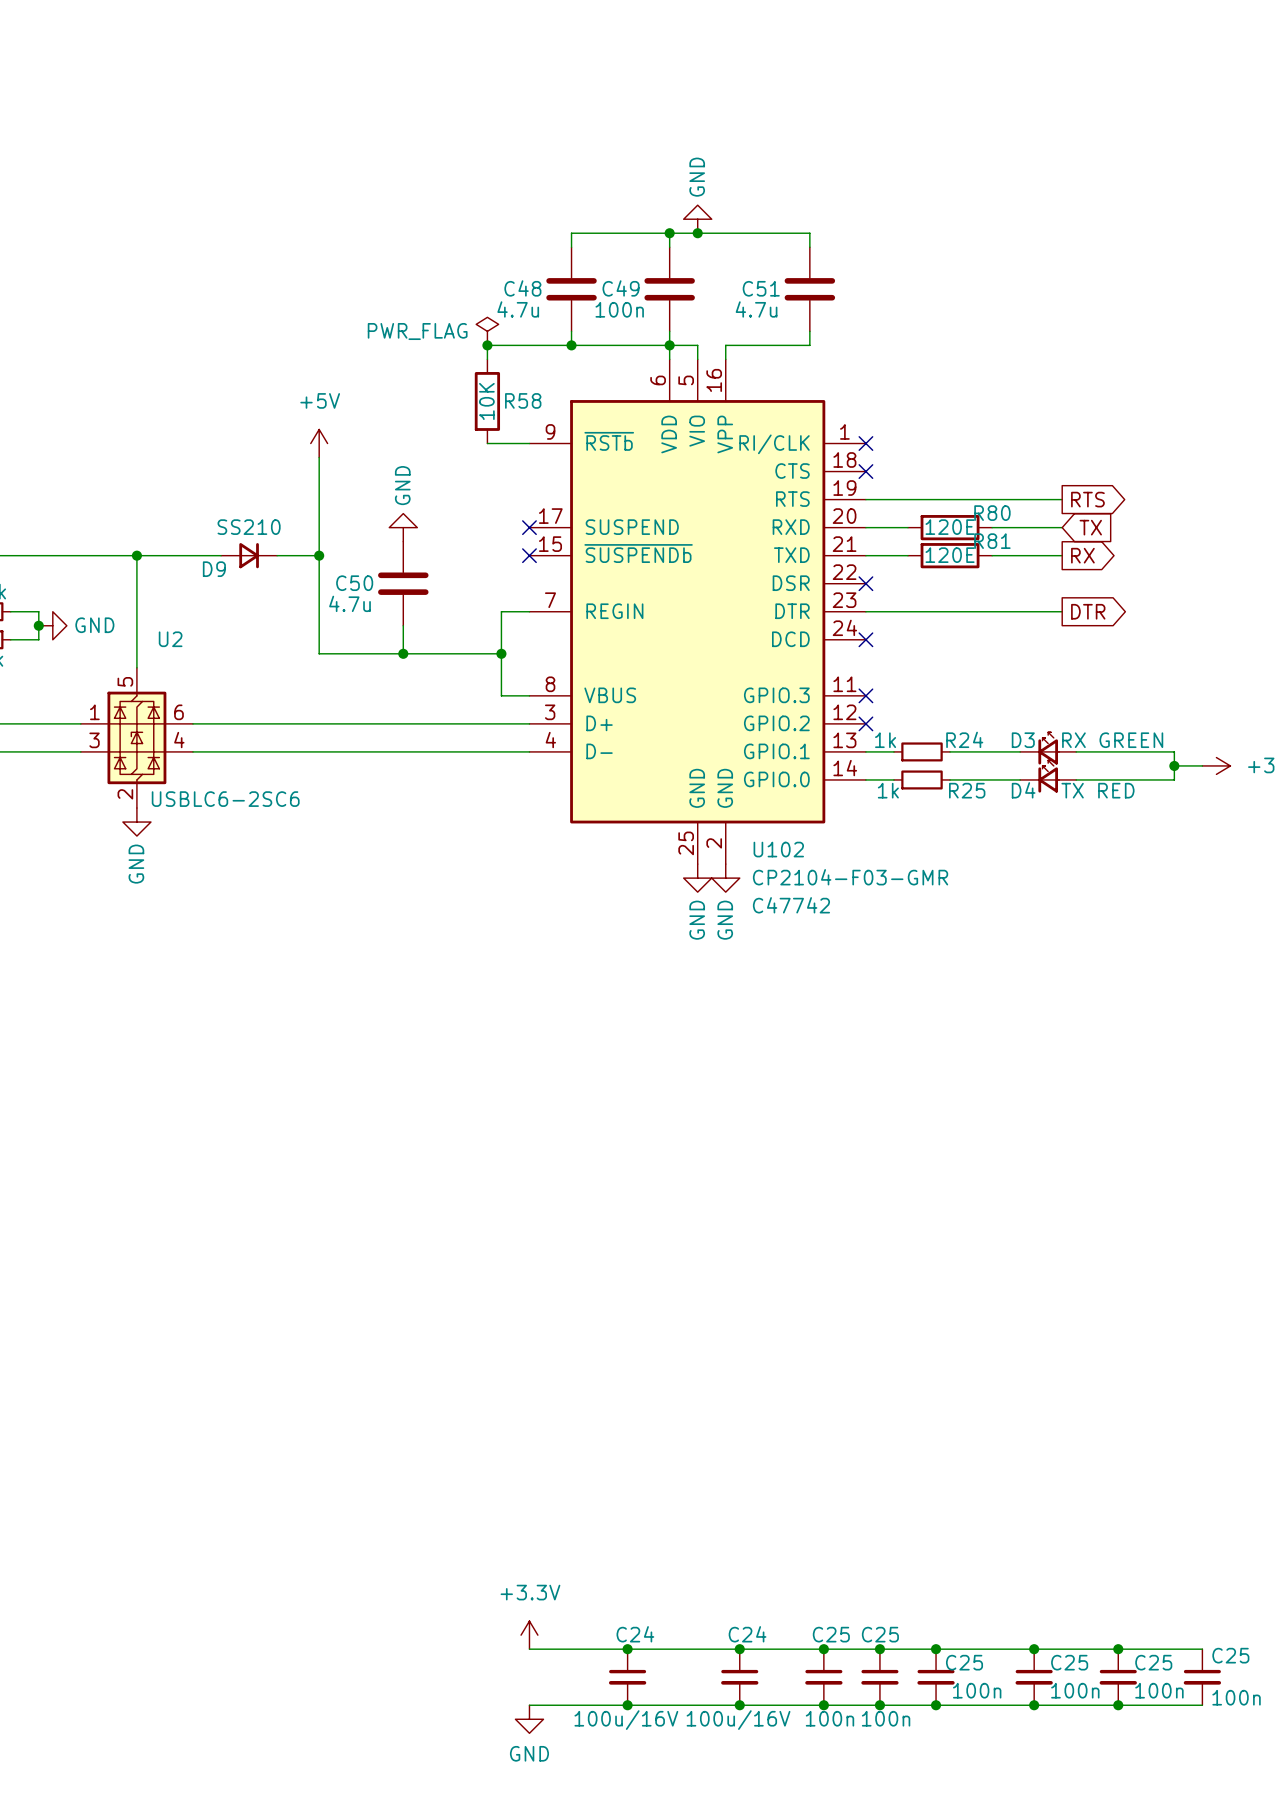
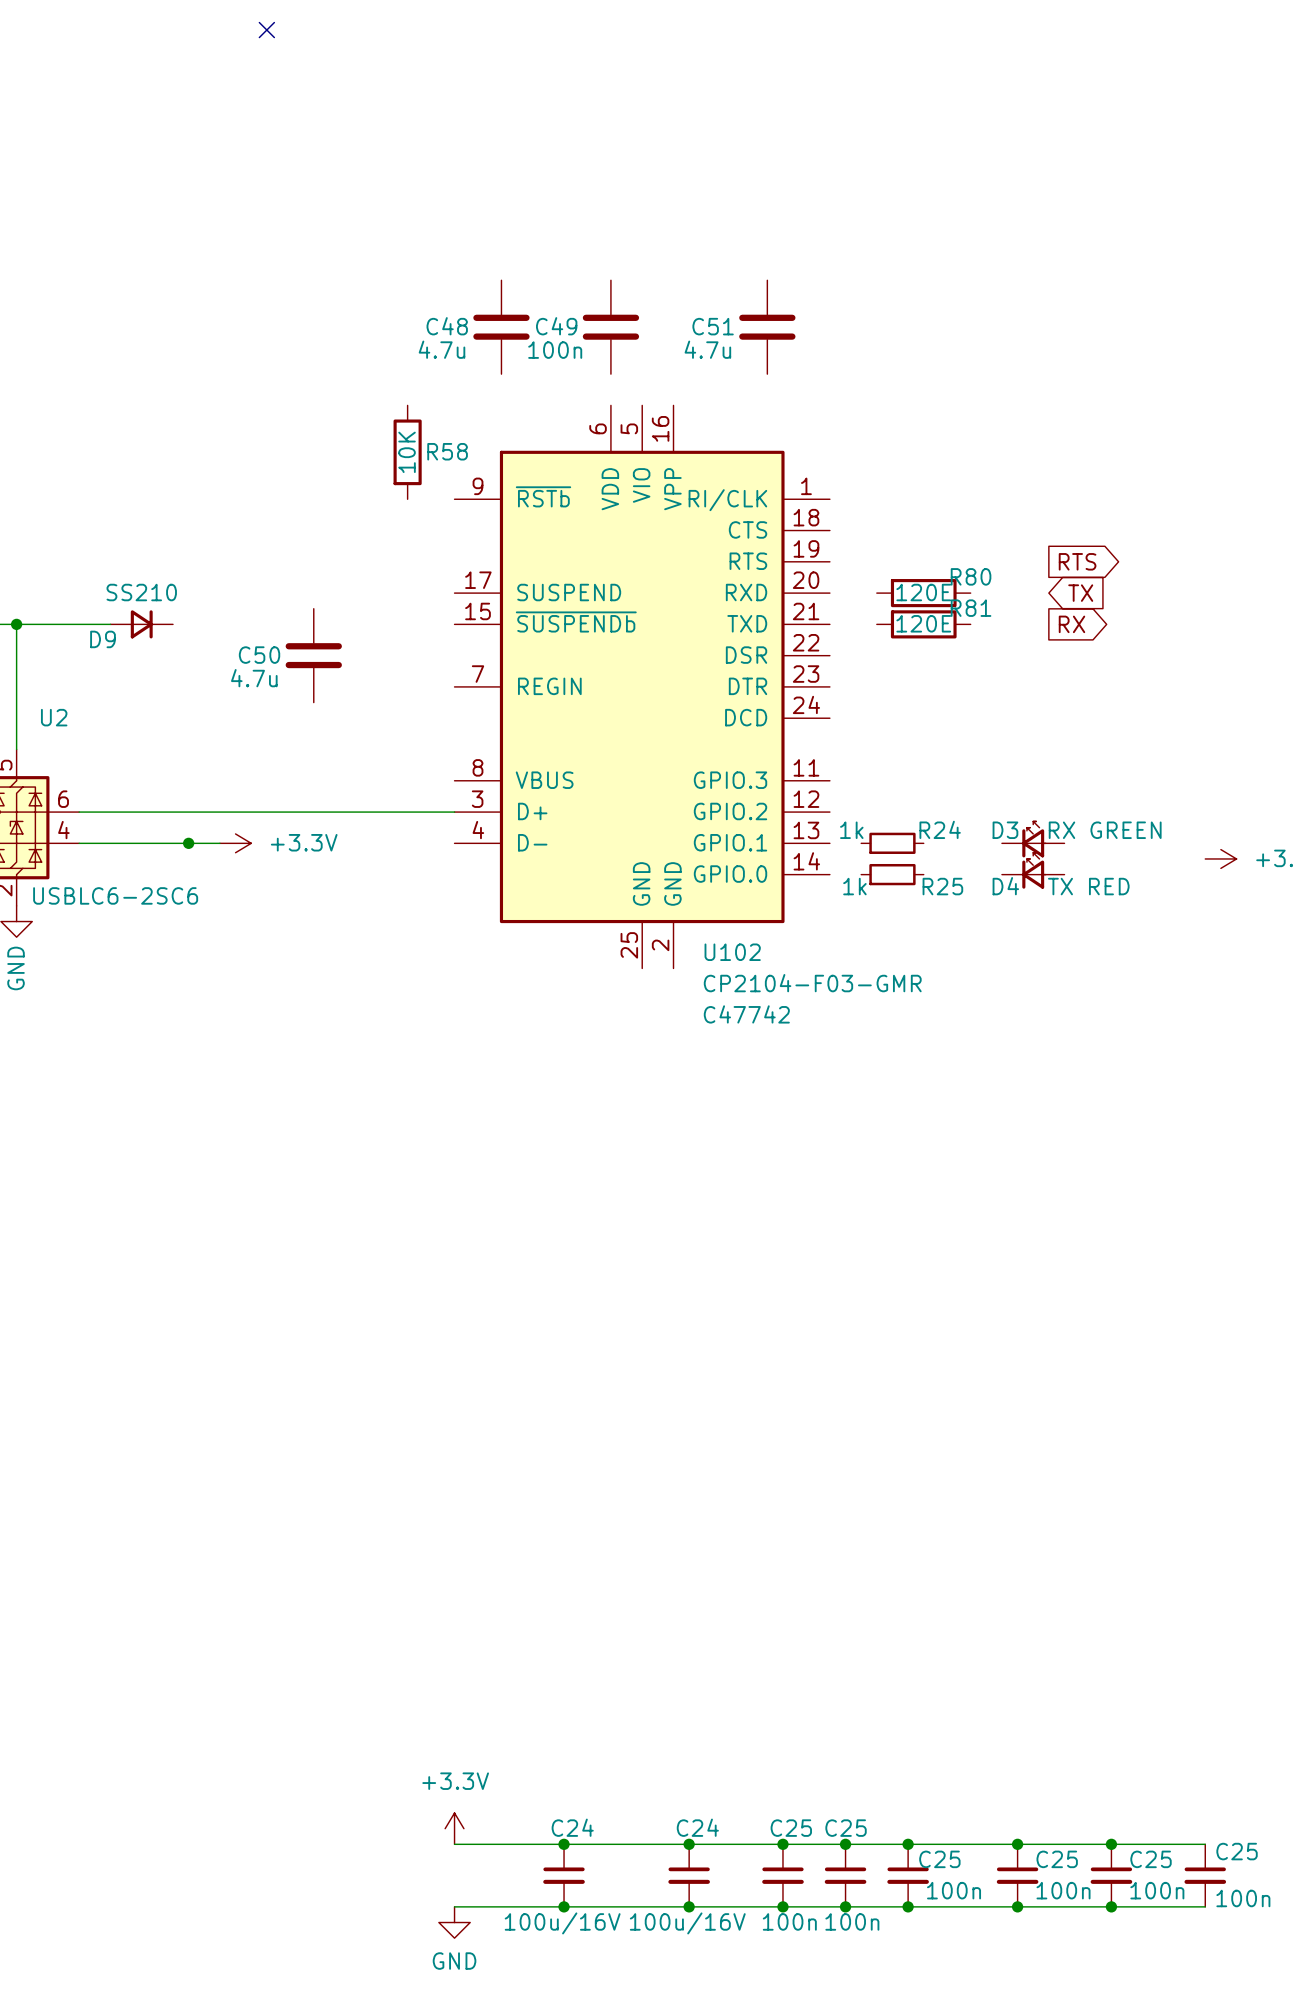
no-connect mark: none -> (266, 30)
power symbol: GND (697, 219) -> none
wire: (669, 233) (669, 247) -> none
junction: (669, 233) -> none
junction: (697, 233) -> none
wire: (571, 247) (571, 233) (809, 233) (809, 247) -> none
power symbol: PWR_FLAG (487, 331) -> none
wire: (571, 331) (571, 345) -> none
wire: (669, 331) (669, 359) -> none
wire: (809, 331) (809, 345) (725, 345) (725, 359) -> none
junction: (487, 345) -> none
junction: (571, 345) -> none
junction: (669, 345) -> none
wire: (487, 359) (487, 345) (697, 345) (697, 359) -> none
power symbol: +5V (319, 443) -> none
wire: (487, 443) (529, 443) -> none
no-connect mark: (865, 443) -> none
wire: (319, 457) (319, 653) (501, 653) -> none
no-connect mark: (865, 471) -> none
wire: (865, 499) (1062, 499) -> none
power symbol: GND (403, 527) -> none
no-connect mark: (529, 527) -> none
wire: (865, 527) (907, 527) -> none
wire: (992, 527) (1062, 527) -> none
wire: (277, 555) (319, 555) -> none
junction: (319, 555) -> none
no-connect mark: (529, 555) -> none
wire: (865, 555) (907, 555) -> none
wire: (992, 555) (1062, 555) -> none
no-connect mark: (865, 583) -> none
wire: (529, 611) (501, 611) (501, 695) (529, 695) -> none
wire: (865, 611) (1062, 611) -> none
global label: DTR (1088, 611) -> none
wire: (403, 625) (403, 653) -> none
no-connect mark: (865, 639) -> none
junction: (403, 653) -> none
junction: (501, 653) -> none
no-connect mark: (865, 695) -> none
no-connect mark: (865, 723) -> none
junction: none -> (188, 843)
wire: (319, 751) (529, 751) -> none
power symbol: none -> +3.3V (235, 843)
wire: (865, 751) (893, 751) -> none
wire: (950, 751) (1020, 751) -> none
wire: (1076, 751) (1174, 751) (1174, 779) (1076, 779) -> none
wire: (1174, 765) (1202, 765) -> none
junction: (1174, 765) -> none
wire: (865, 779) (893, 779) -> none
wire: (950, 779) (1020, 779) -> none
power symbol: GND (697, 878) -> none
power symbol: GND (725, 878) -> none

